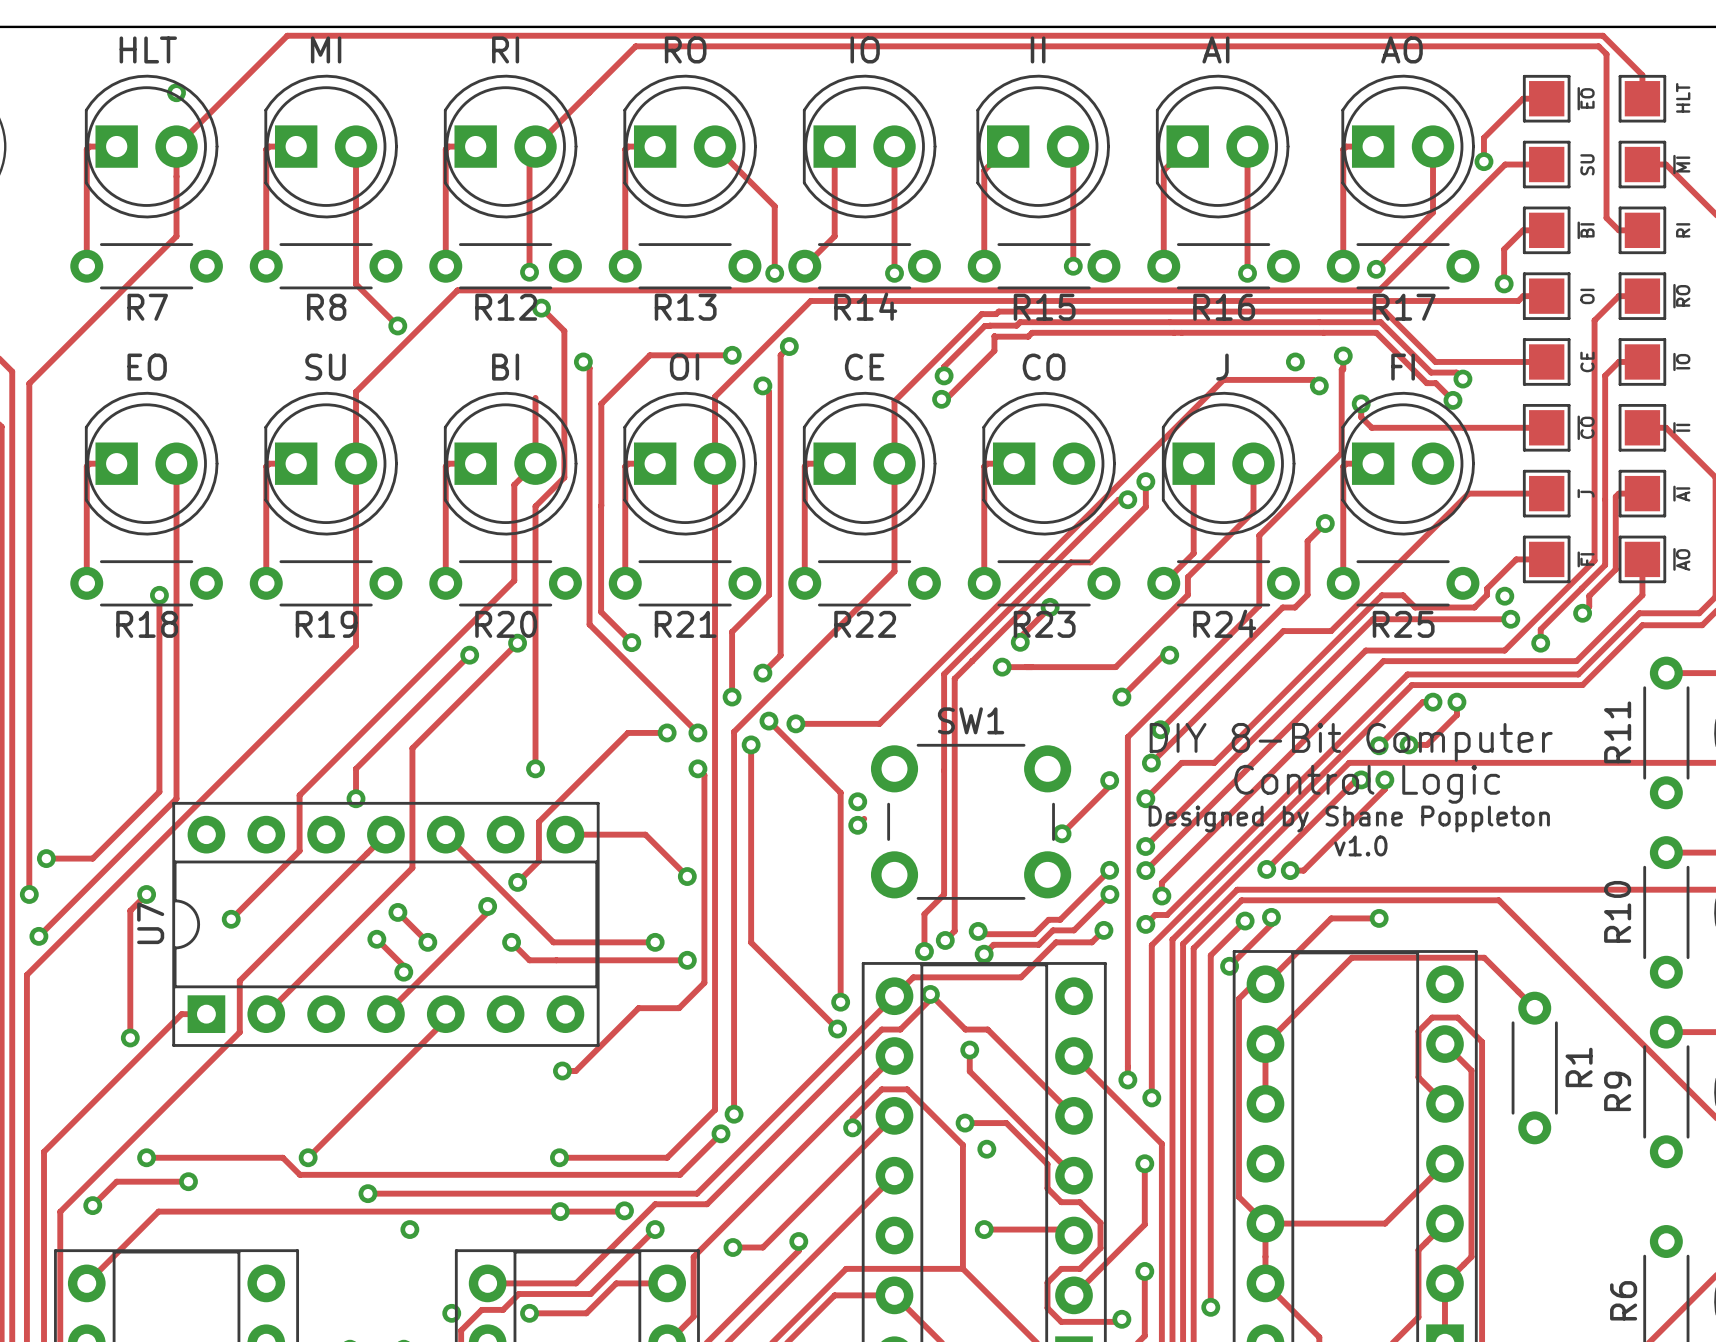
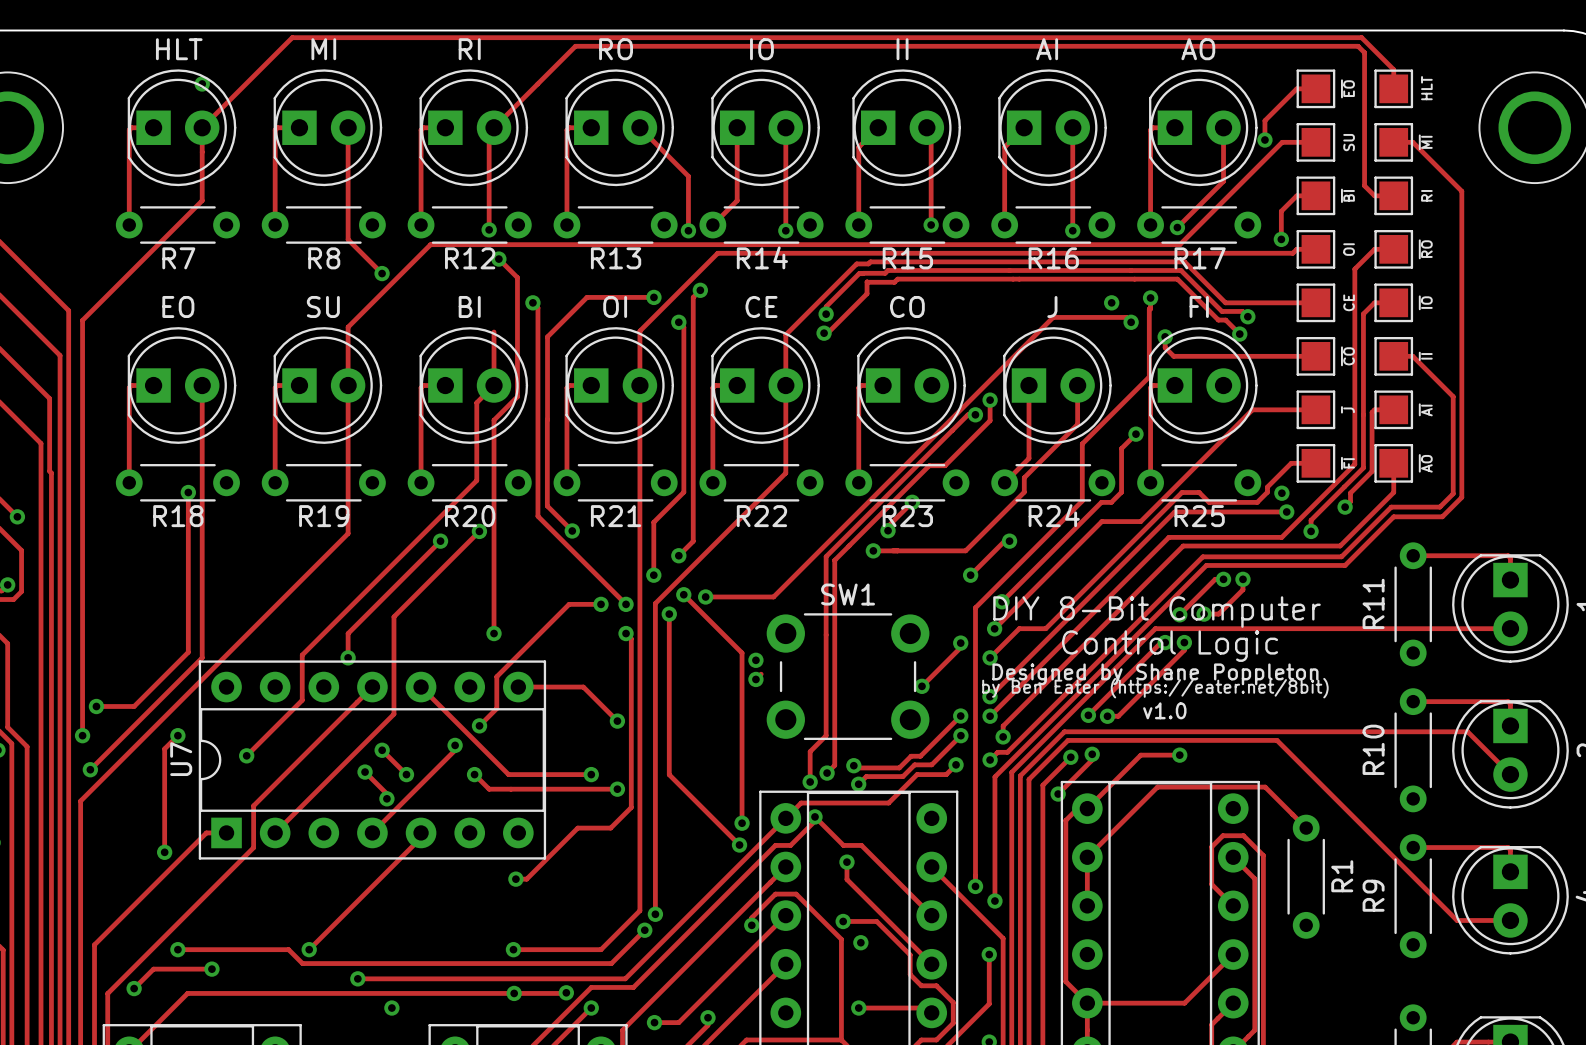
text: none -> by Ben Eater (https://eater.net/8bit) (1155, 688)
text position: v1.0 (1360, 845) -> v1.0 (1164, 710)

